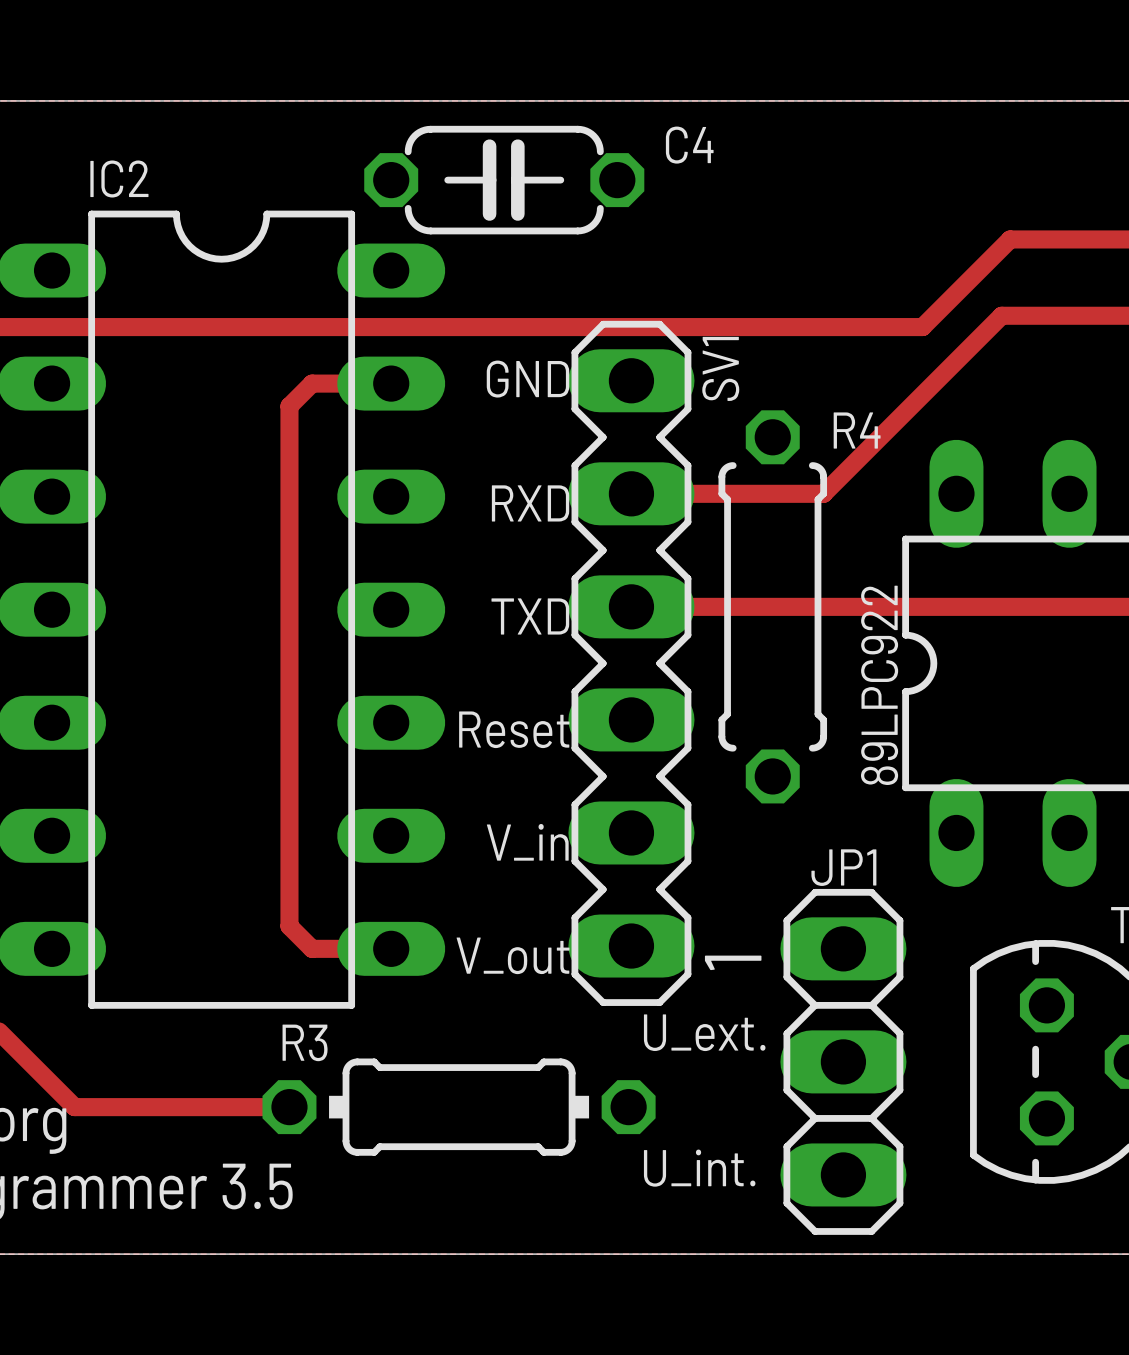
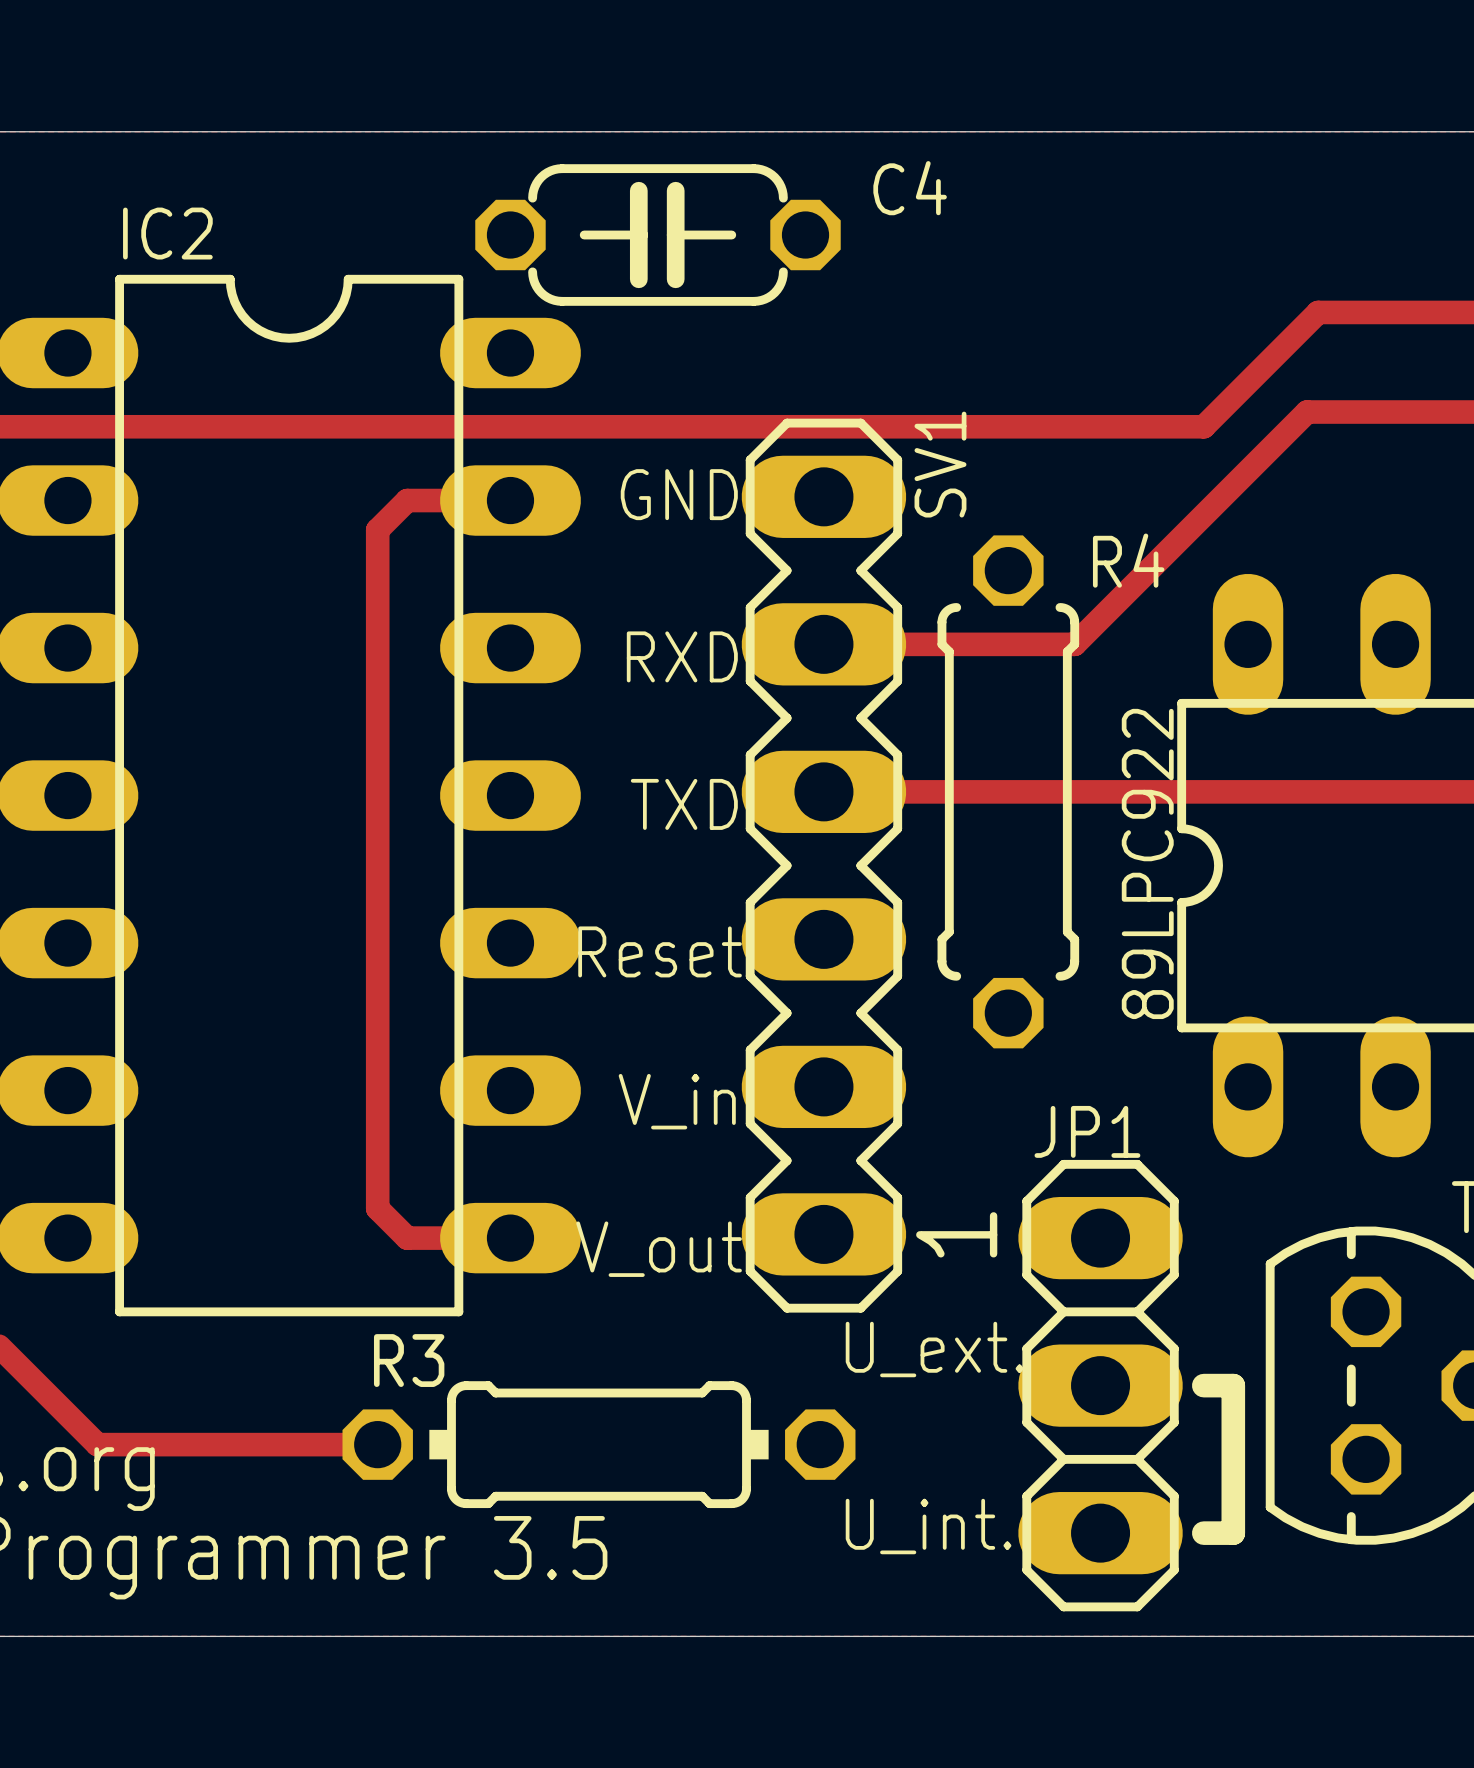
line: none -> (1203, 1385) (1233, 1385) (1233, 1533) (1203, 1533)

